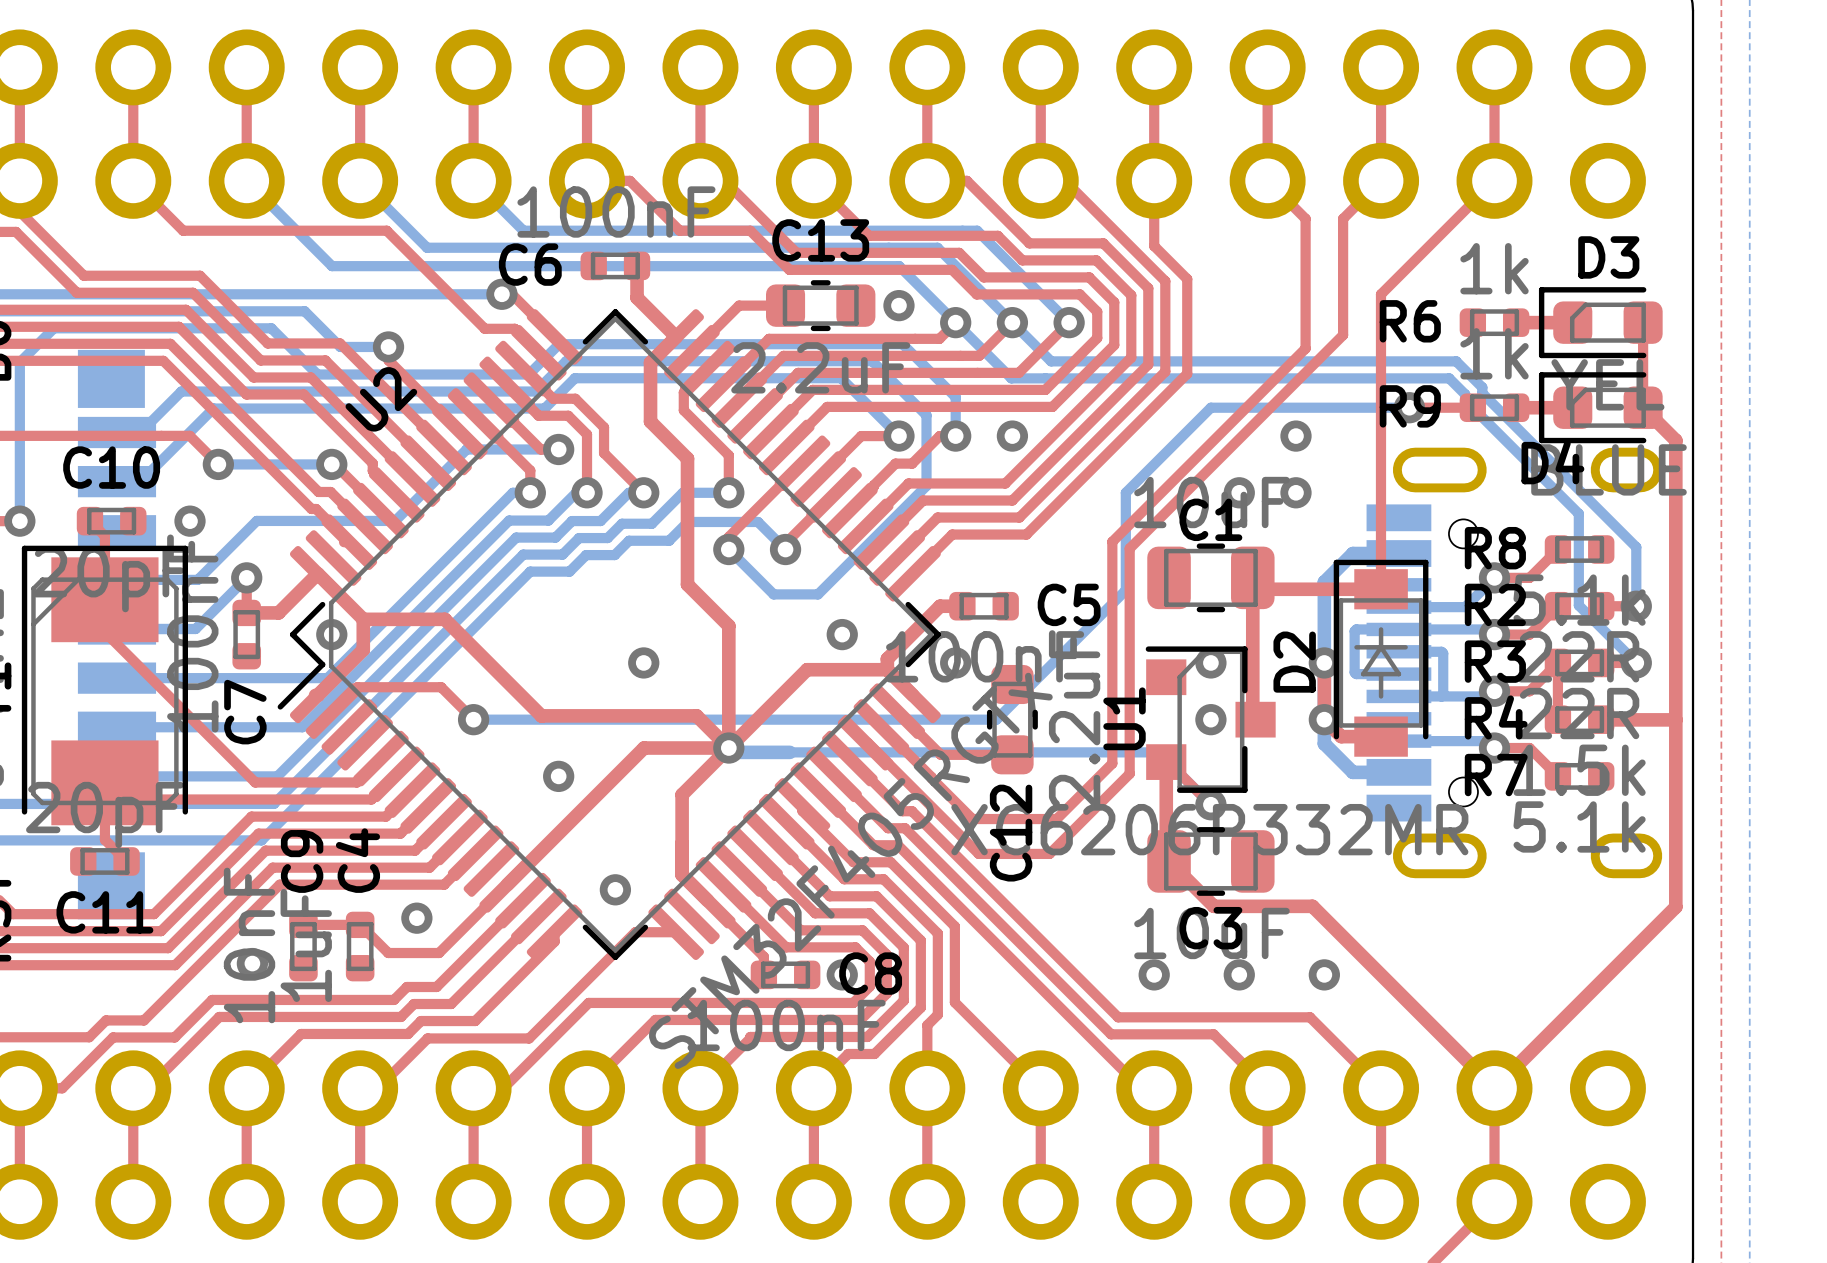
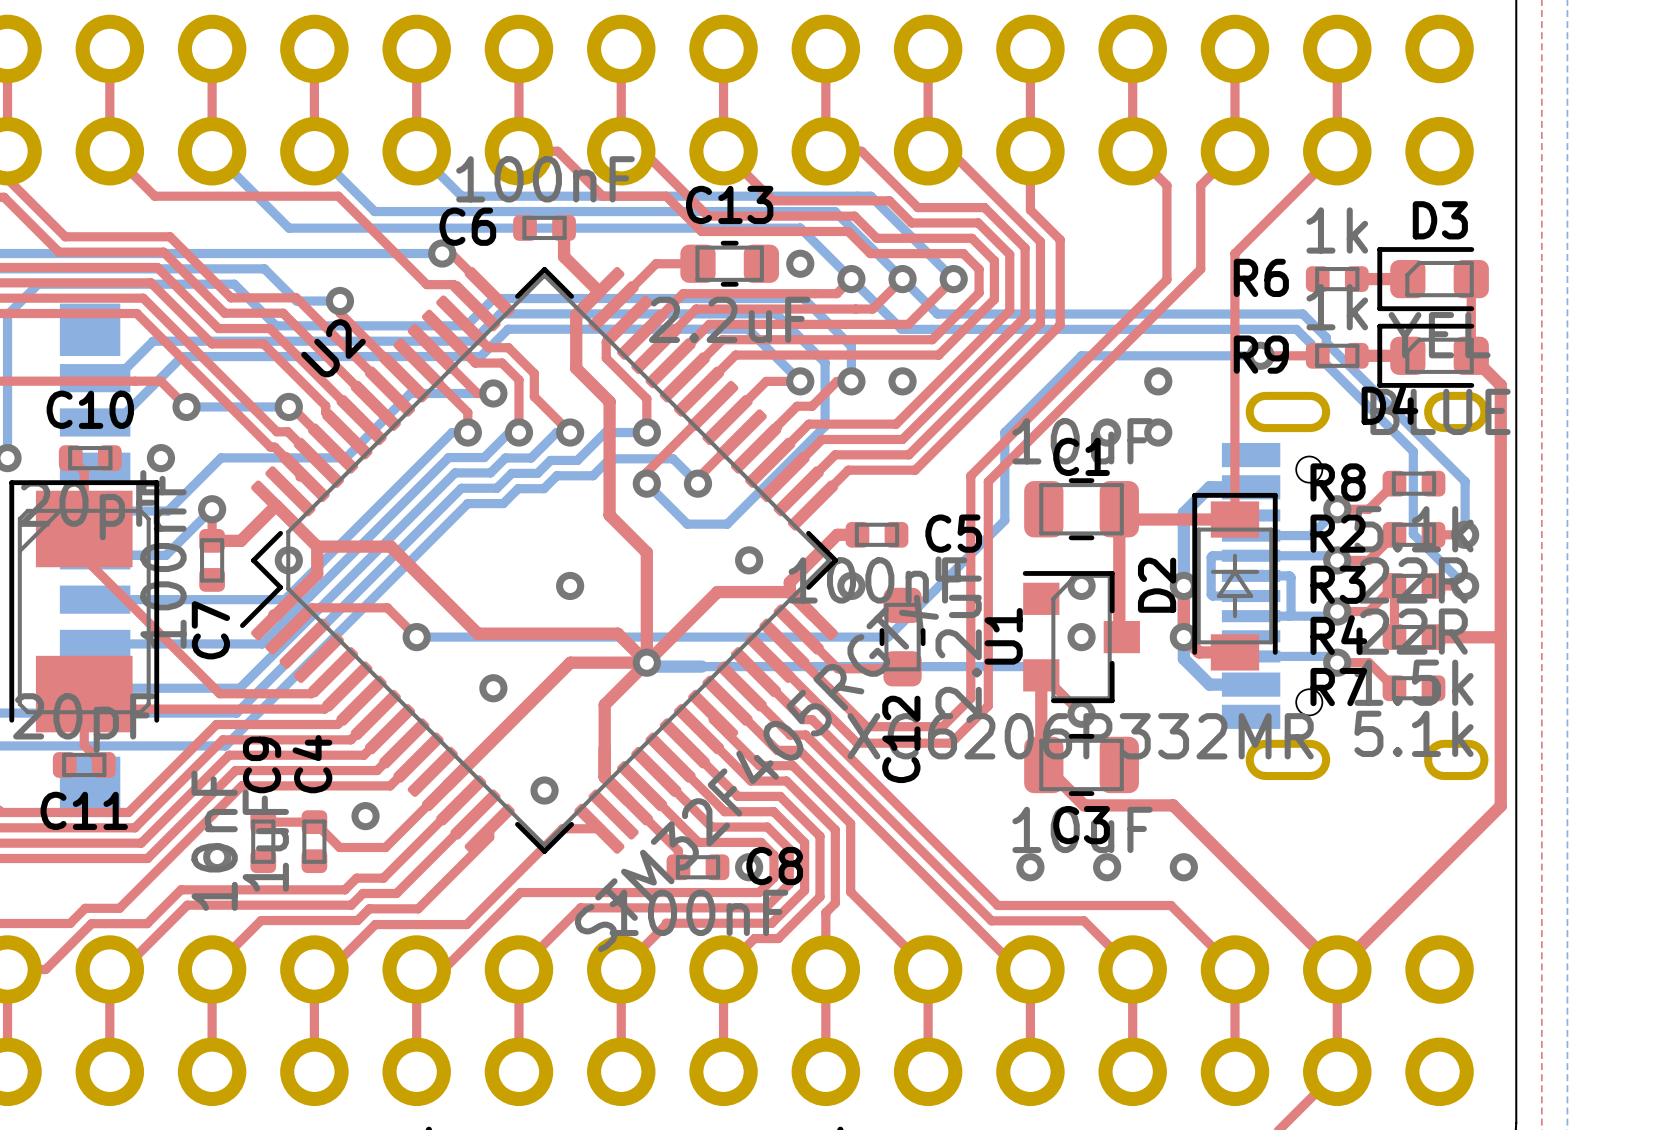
top track: (1343, 311) (1343, 335) (1129, 548) (1129, 773) (1107, 796) -> (1200, 269) (988, 481) (988, 705)
top track: (1305, 323) (1305, 348) (1112, 541) (1112, 763) (1088, 787) -> (1166, 279) (970, 475) (970, 698)
top track: (962, 837) (978, 853) (1049, 853) (1066, 837) -> (857, 743) (951, 743)

